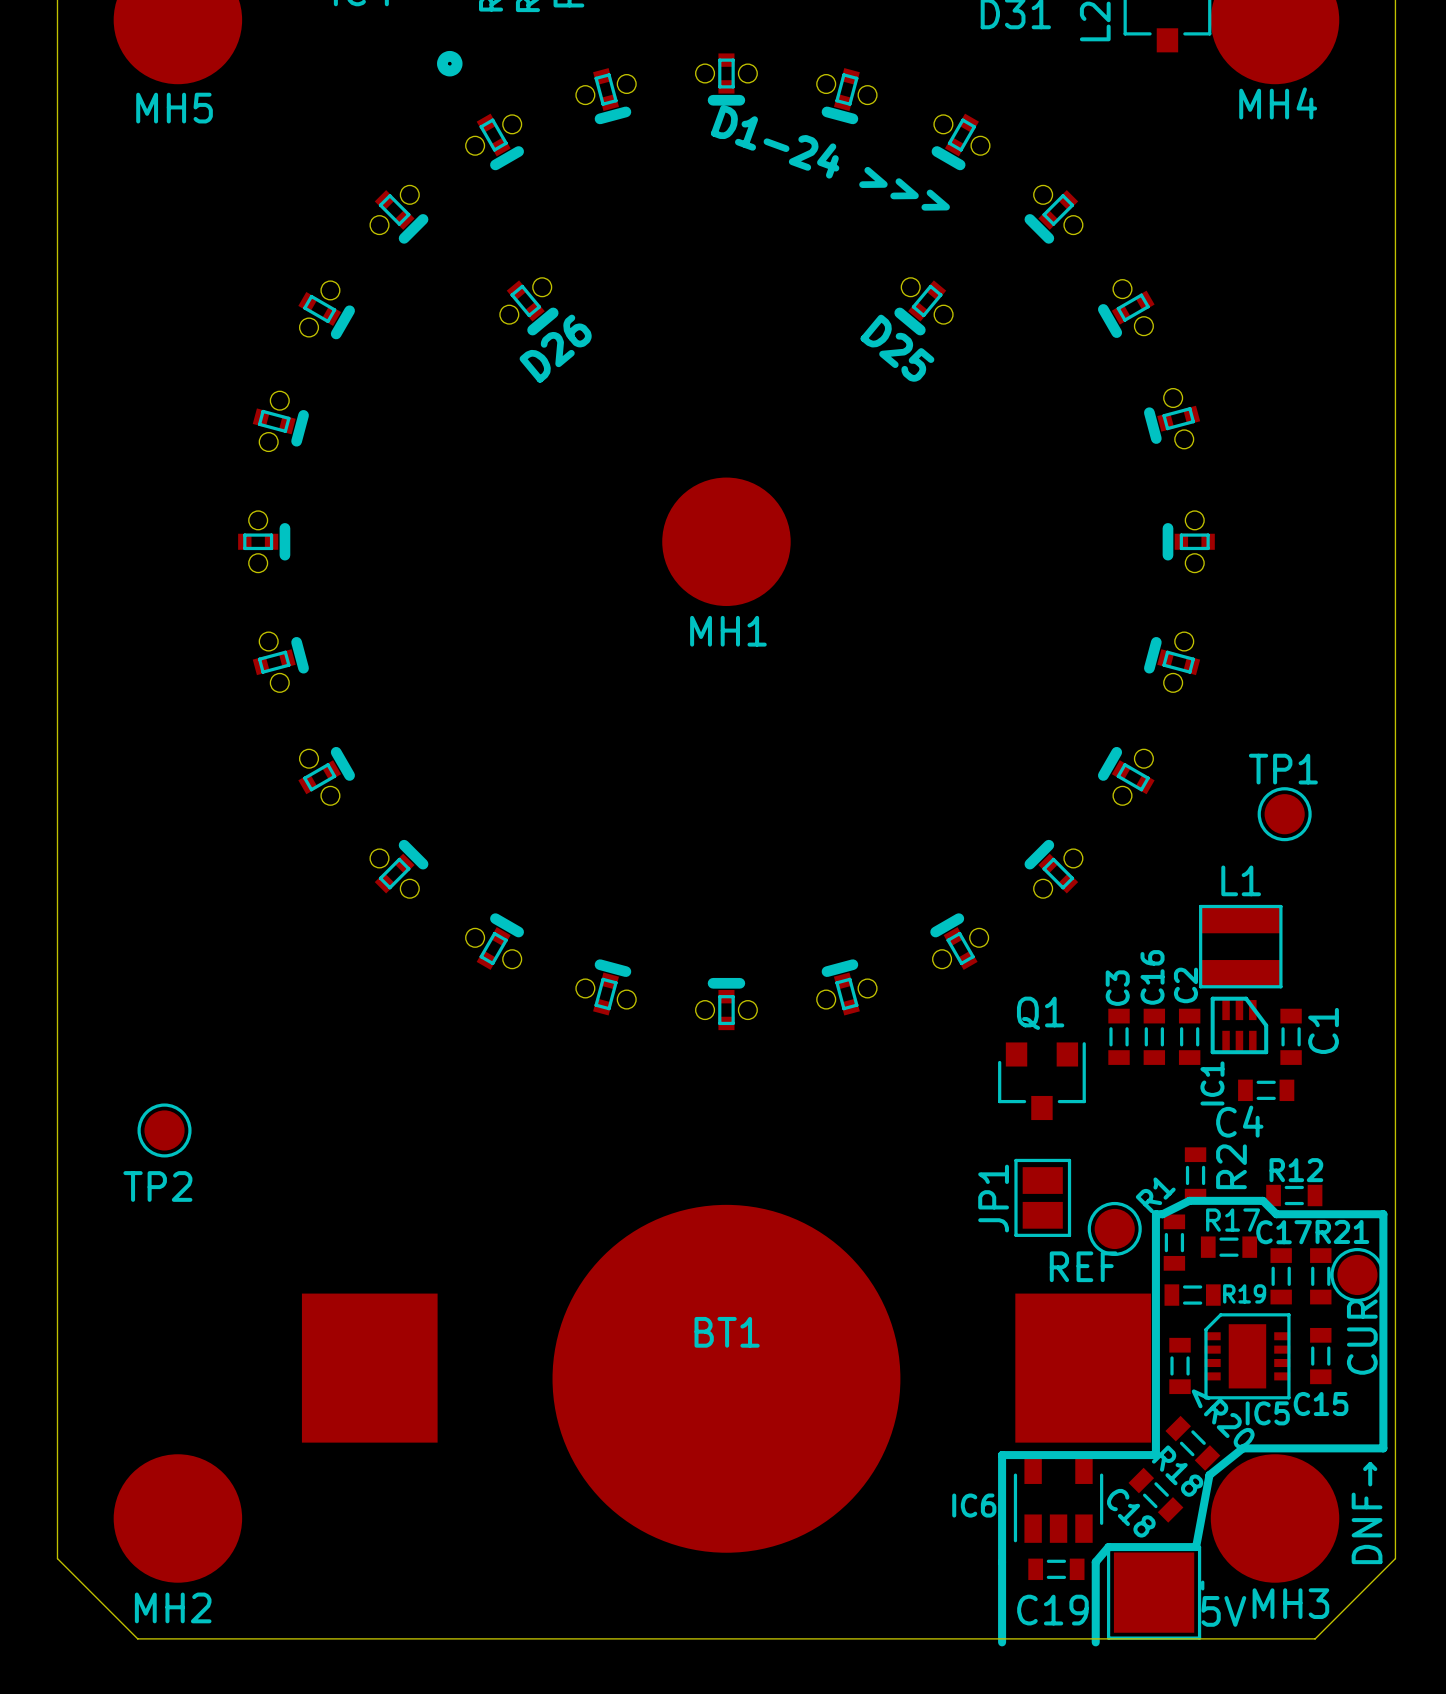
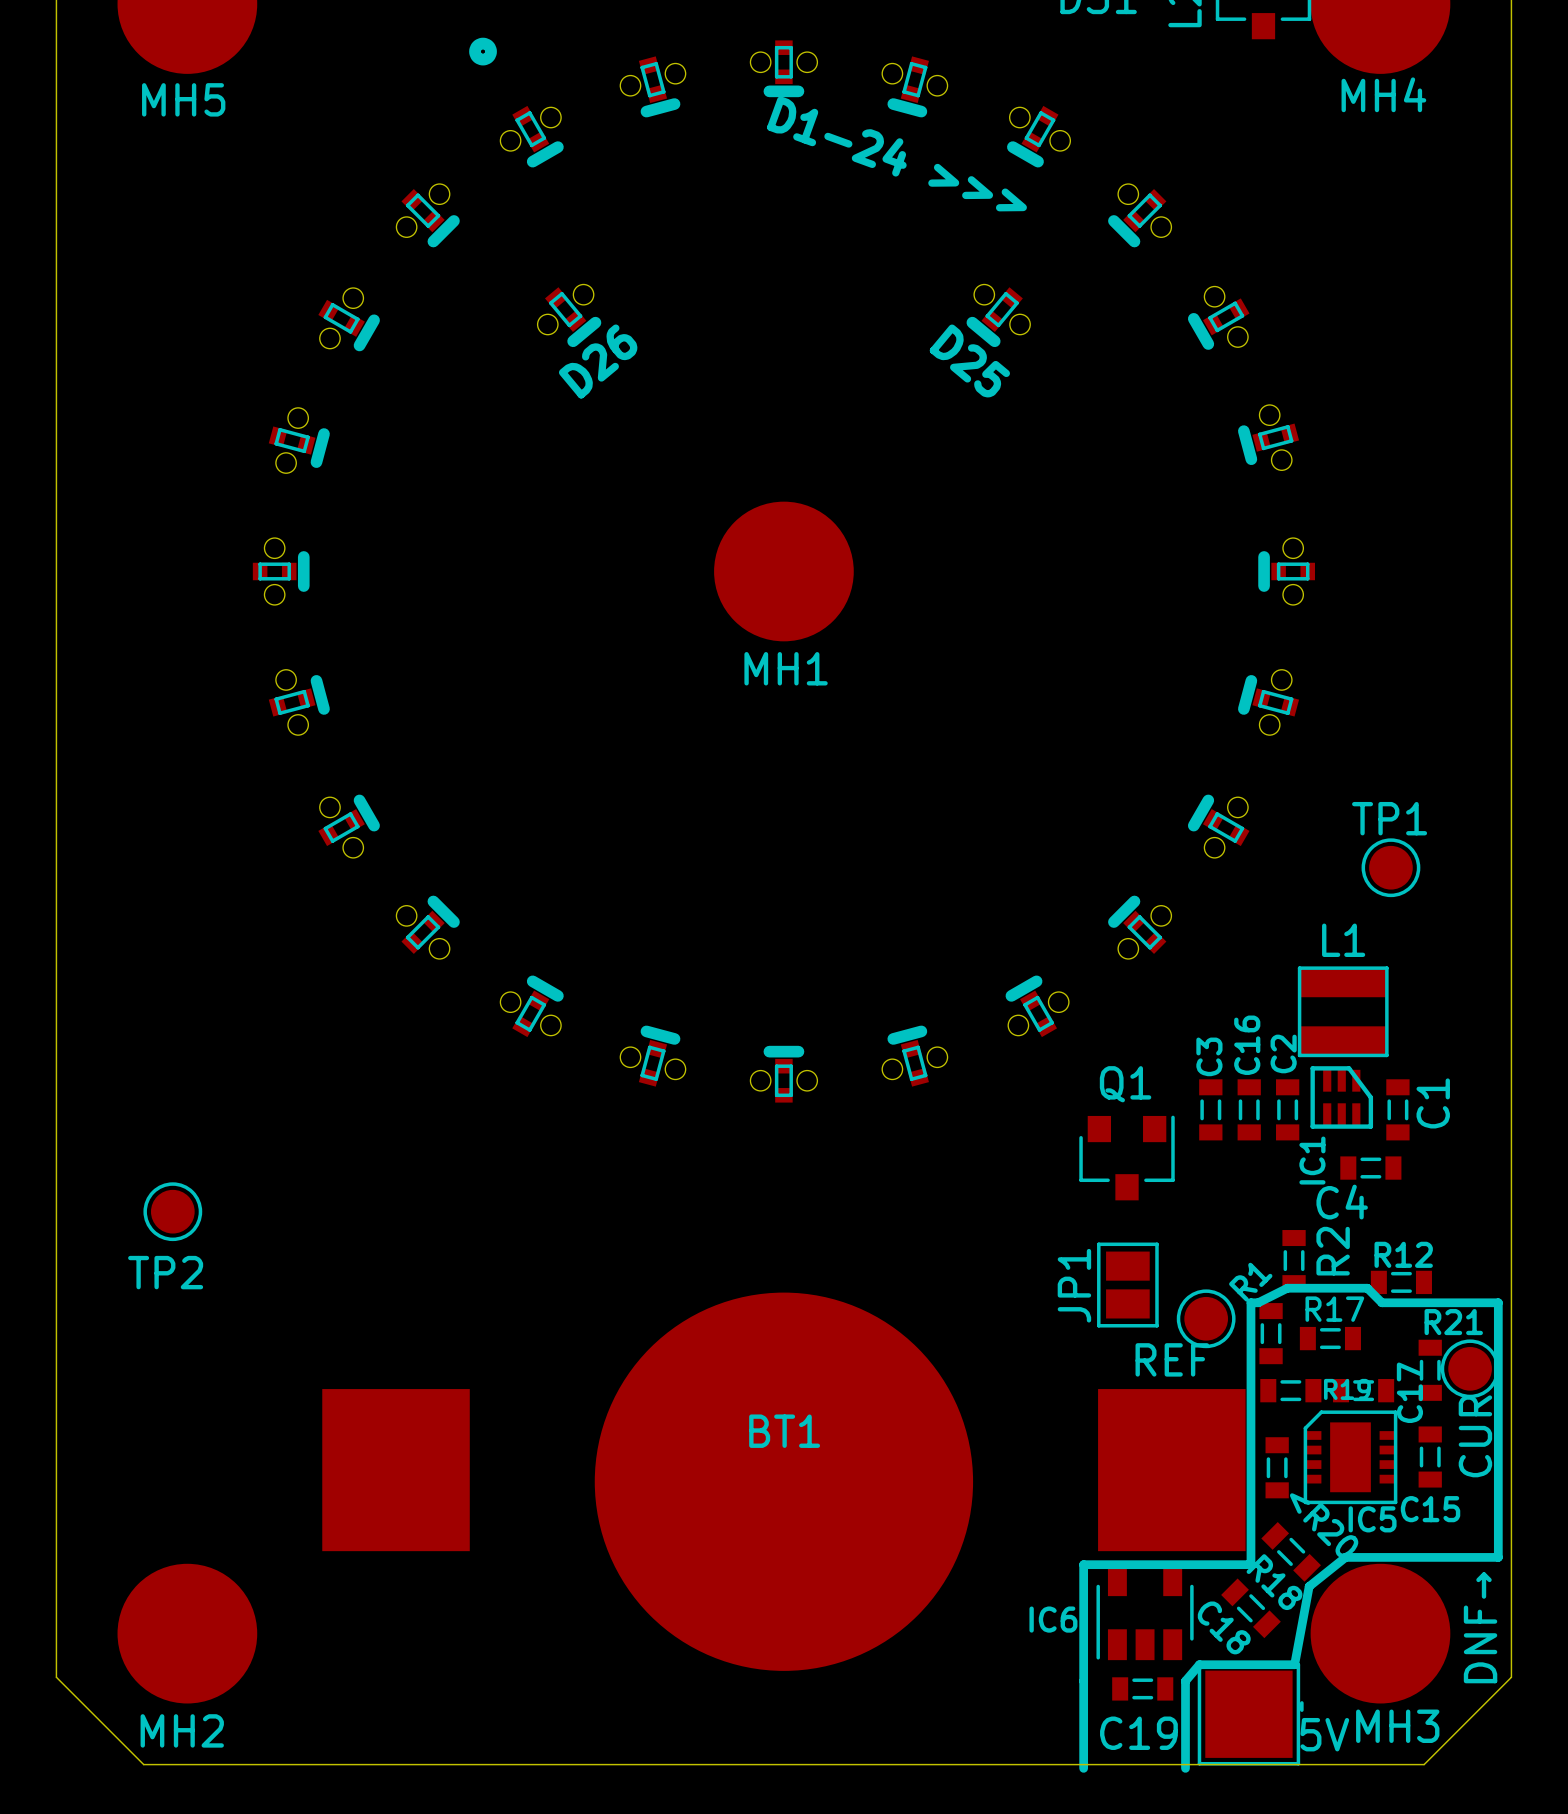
C17 rotation: 0° (1281, 1276) -> 90° clockwise (1363, 1390)

